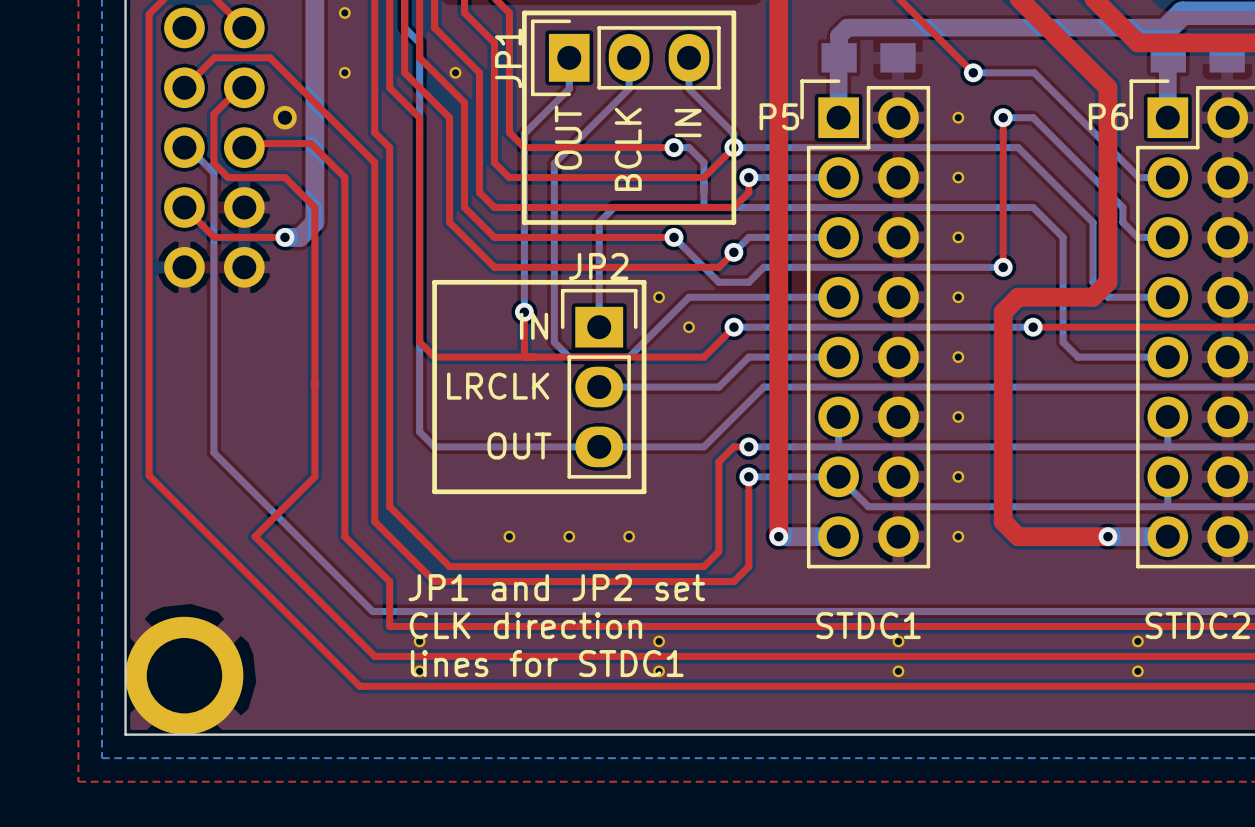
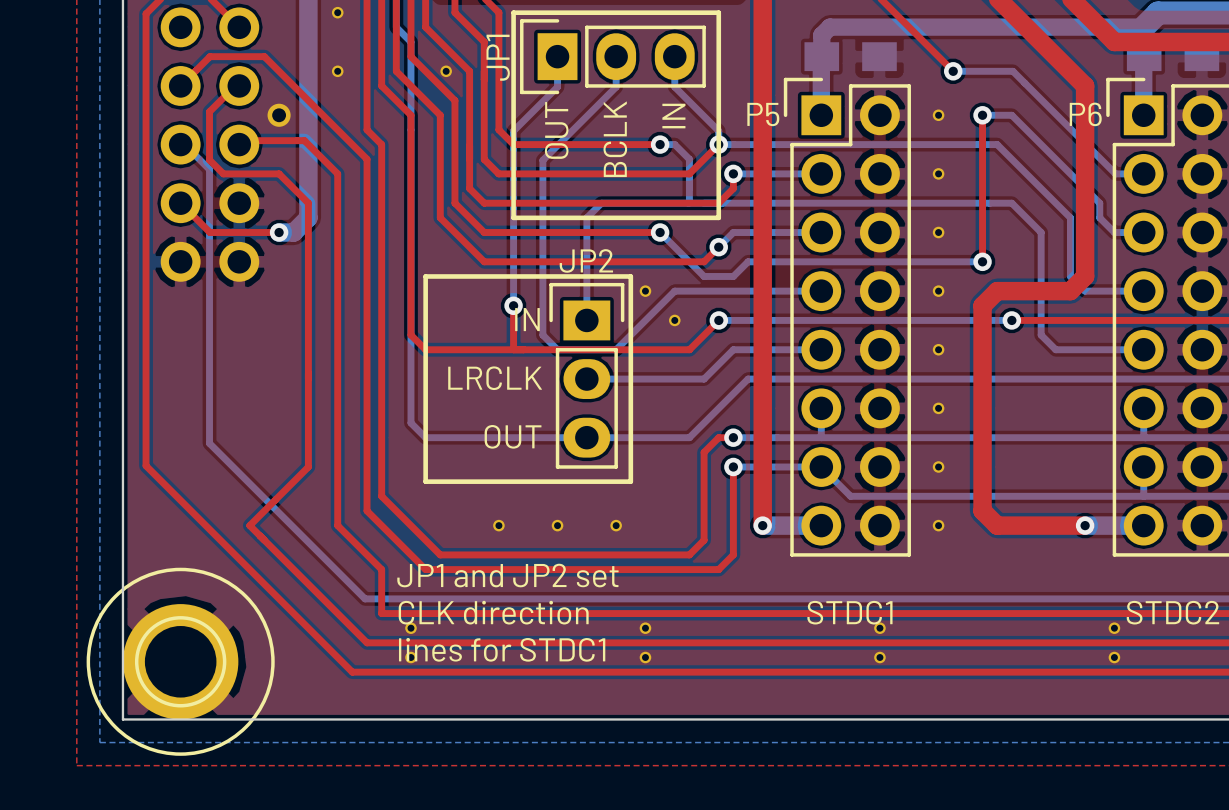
part footprint: [125, 616, 244, 735] -> [86, 567, 275, 756]

